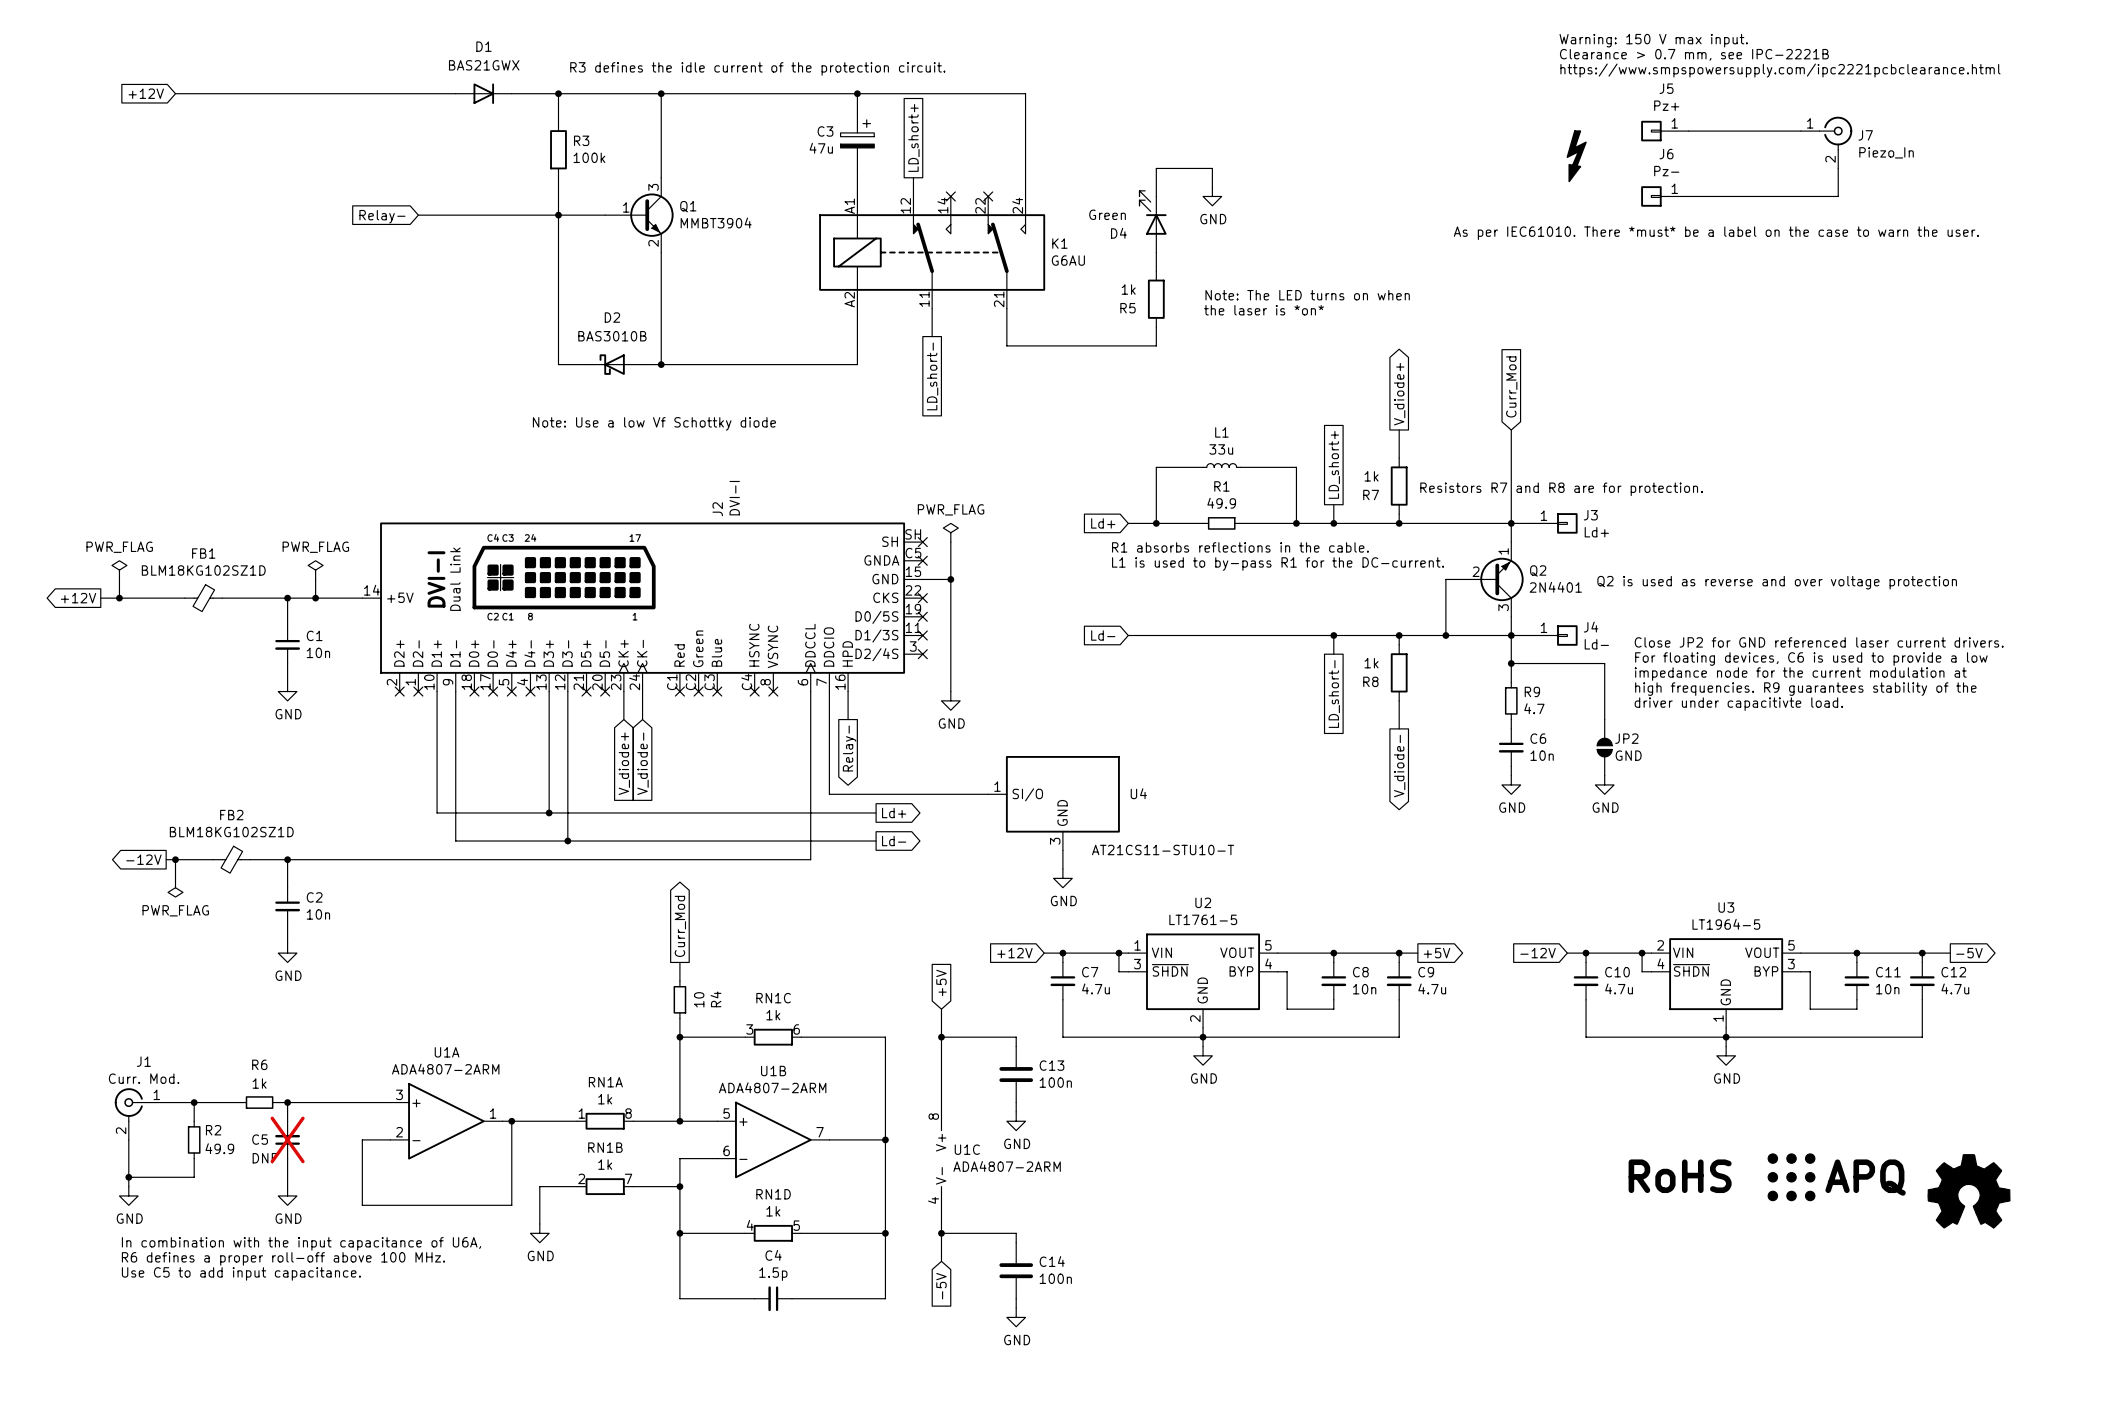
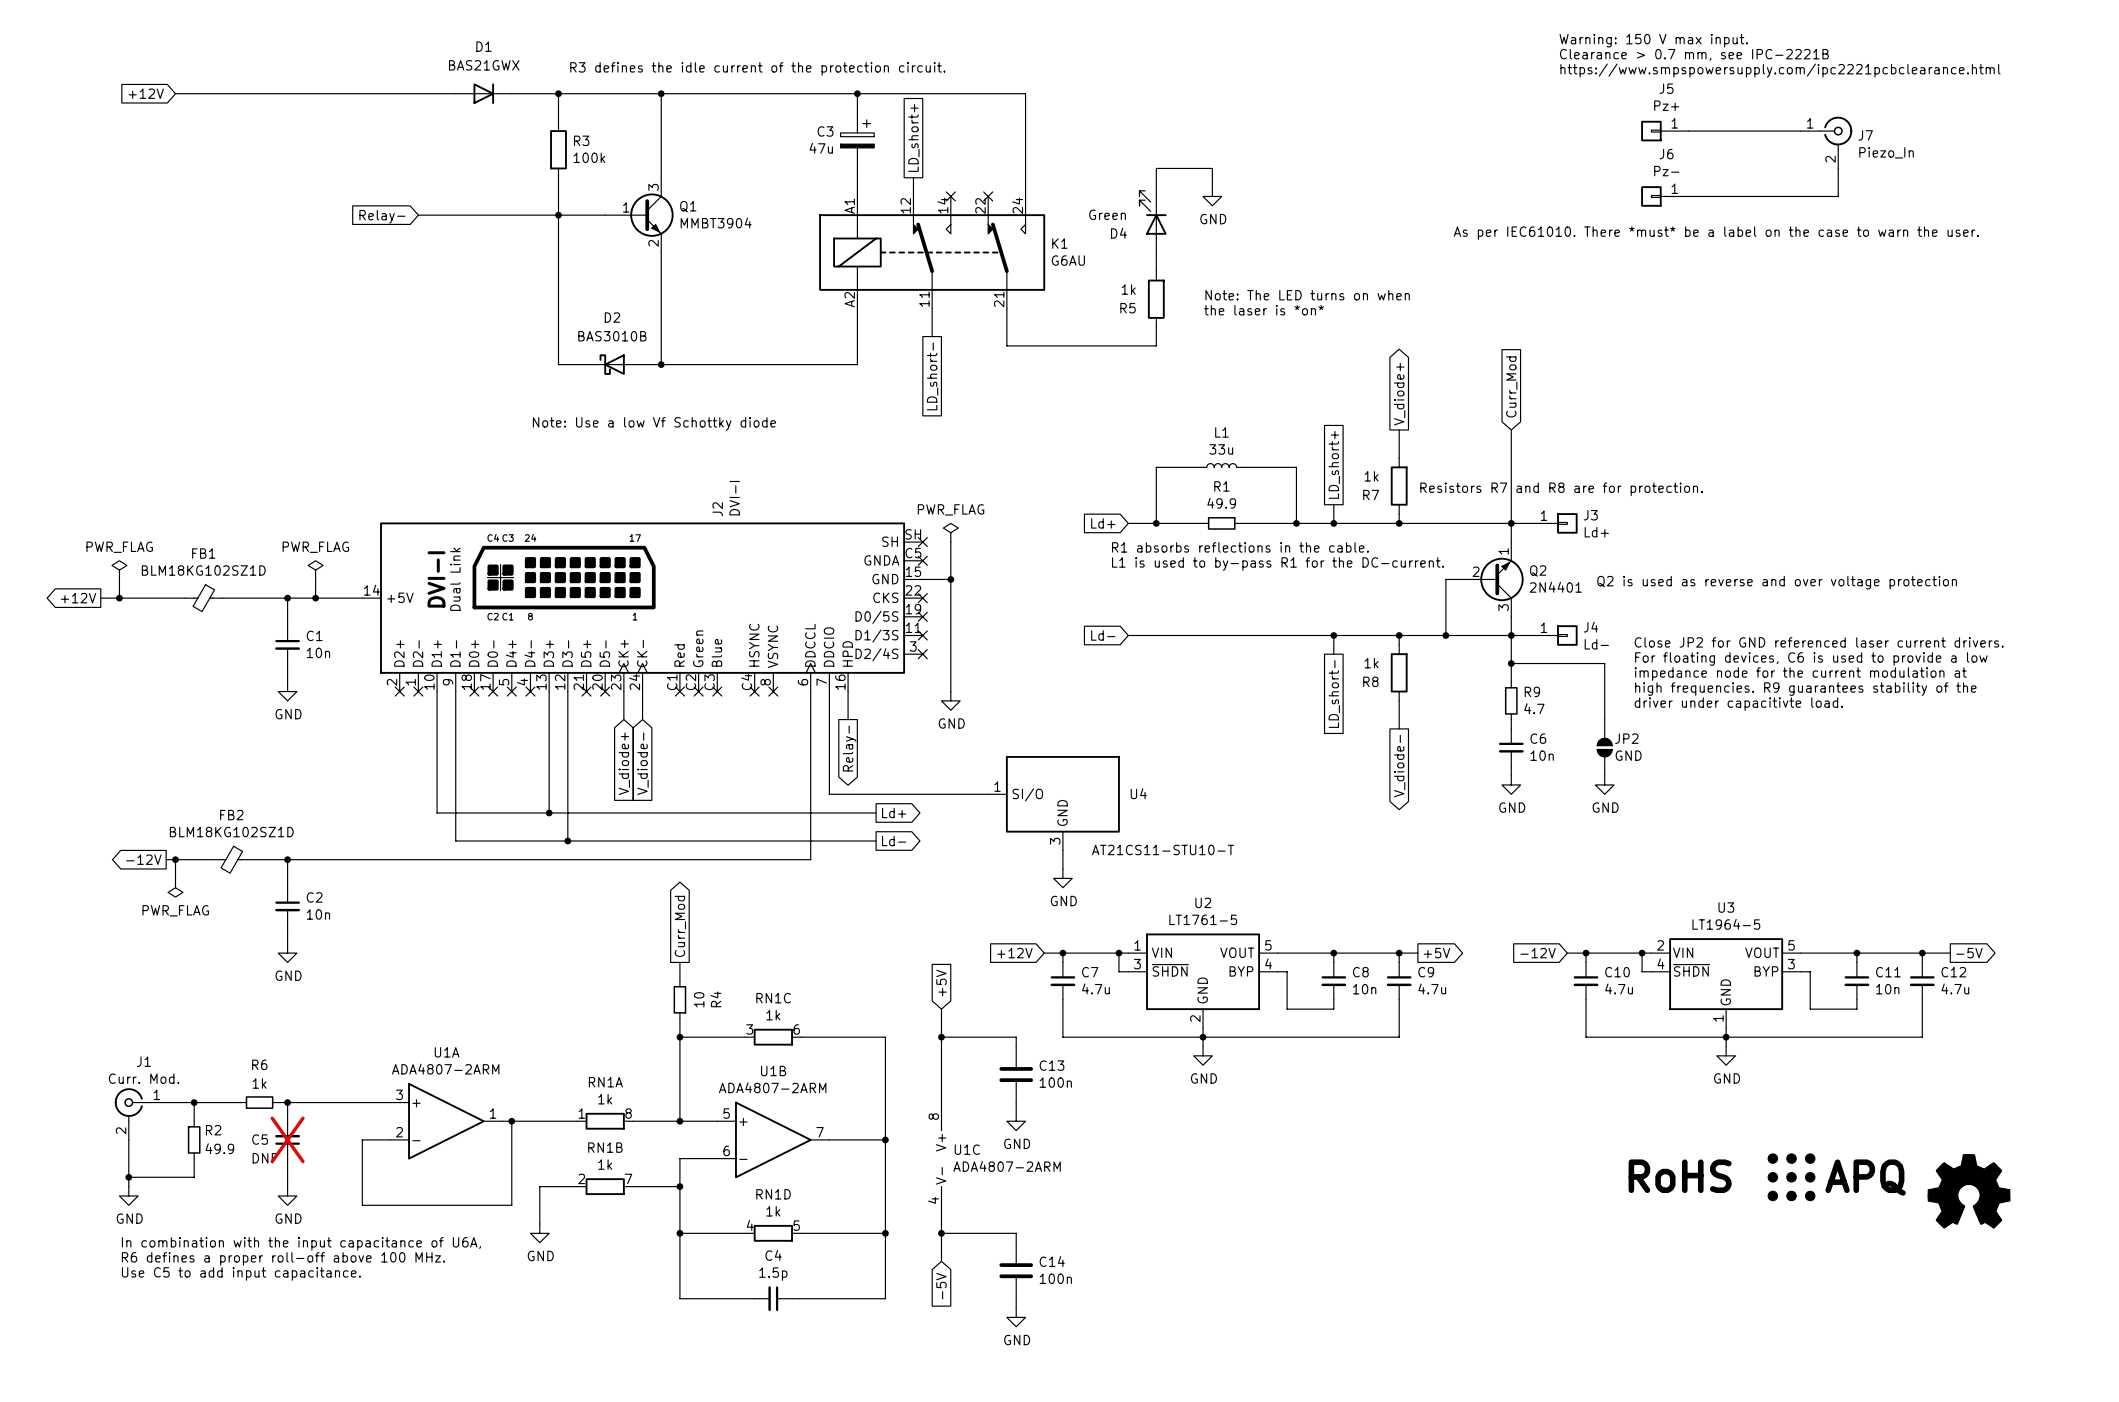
part: (1576, 156) -> none

